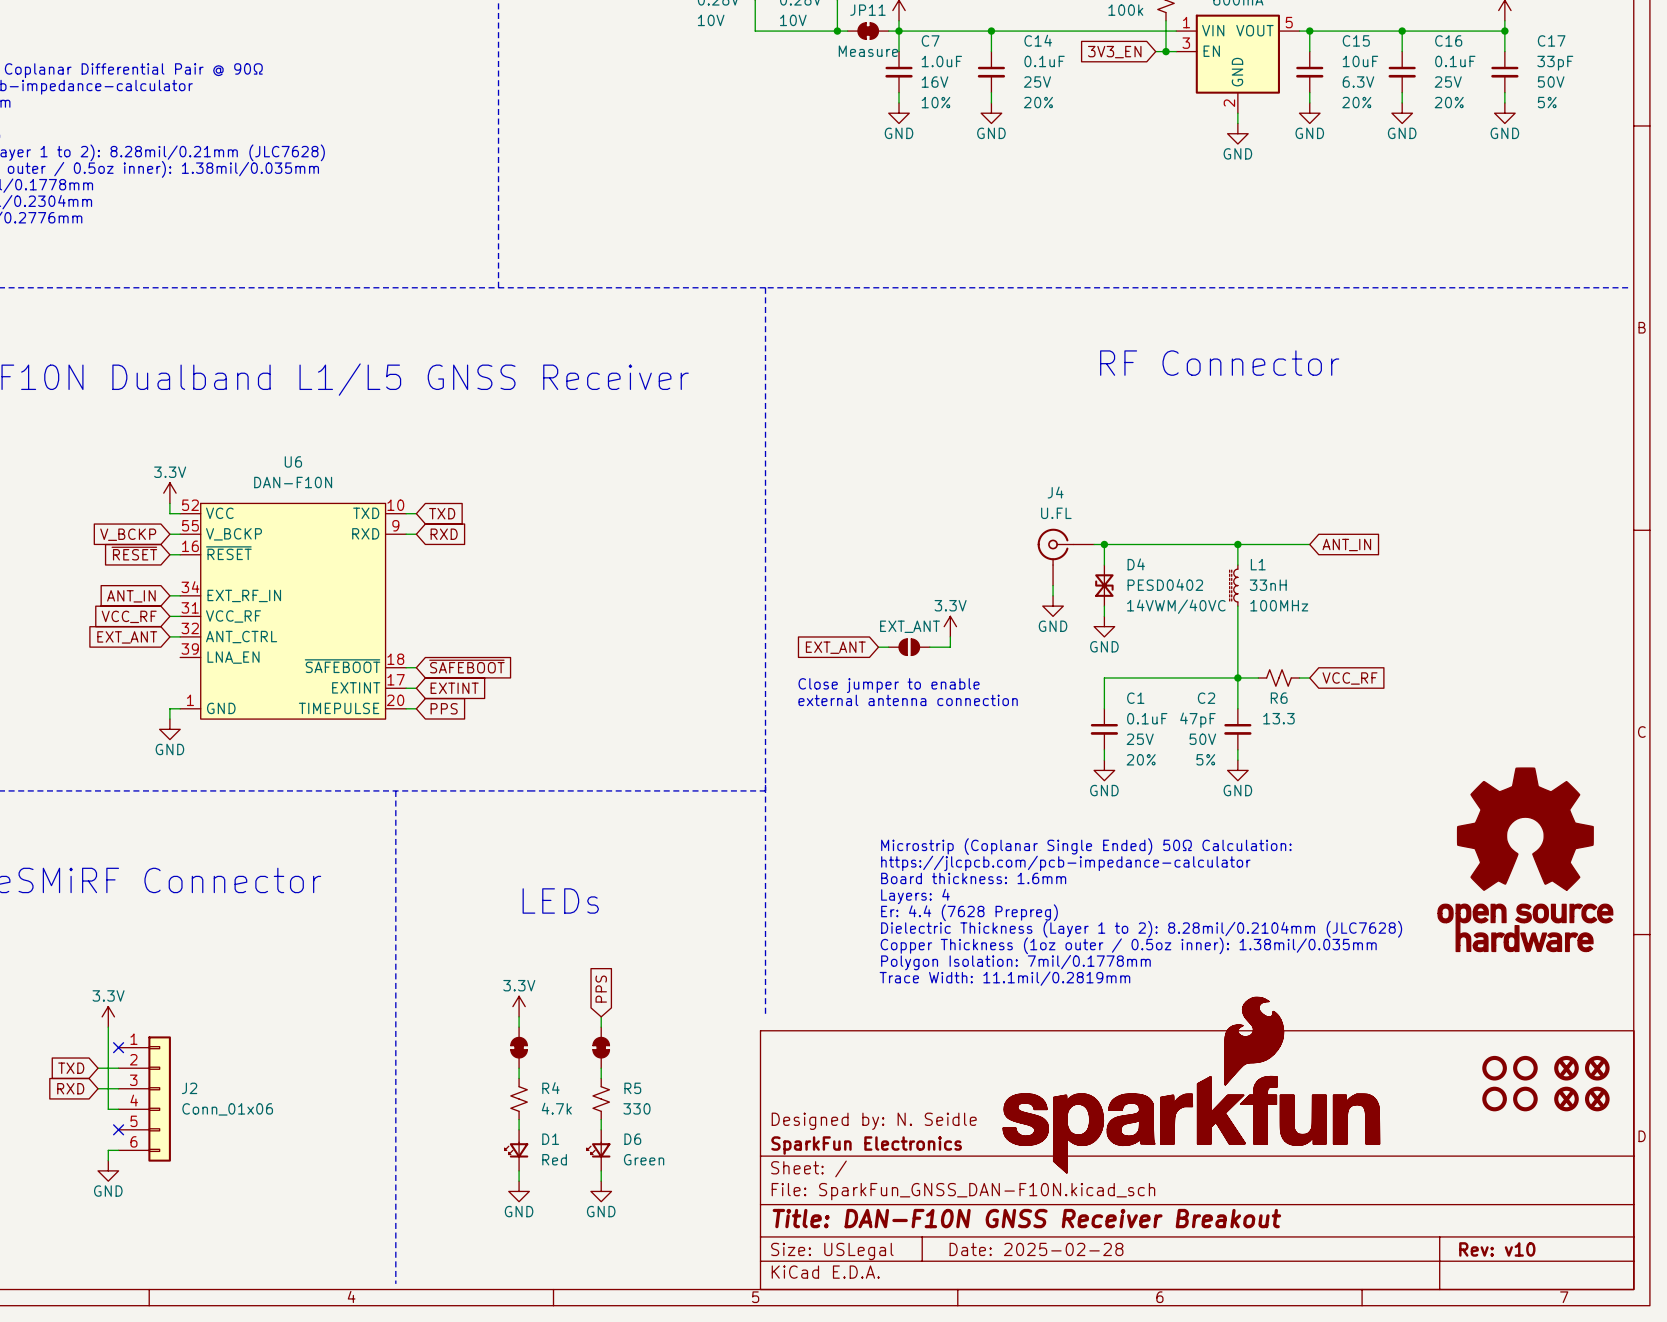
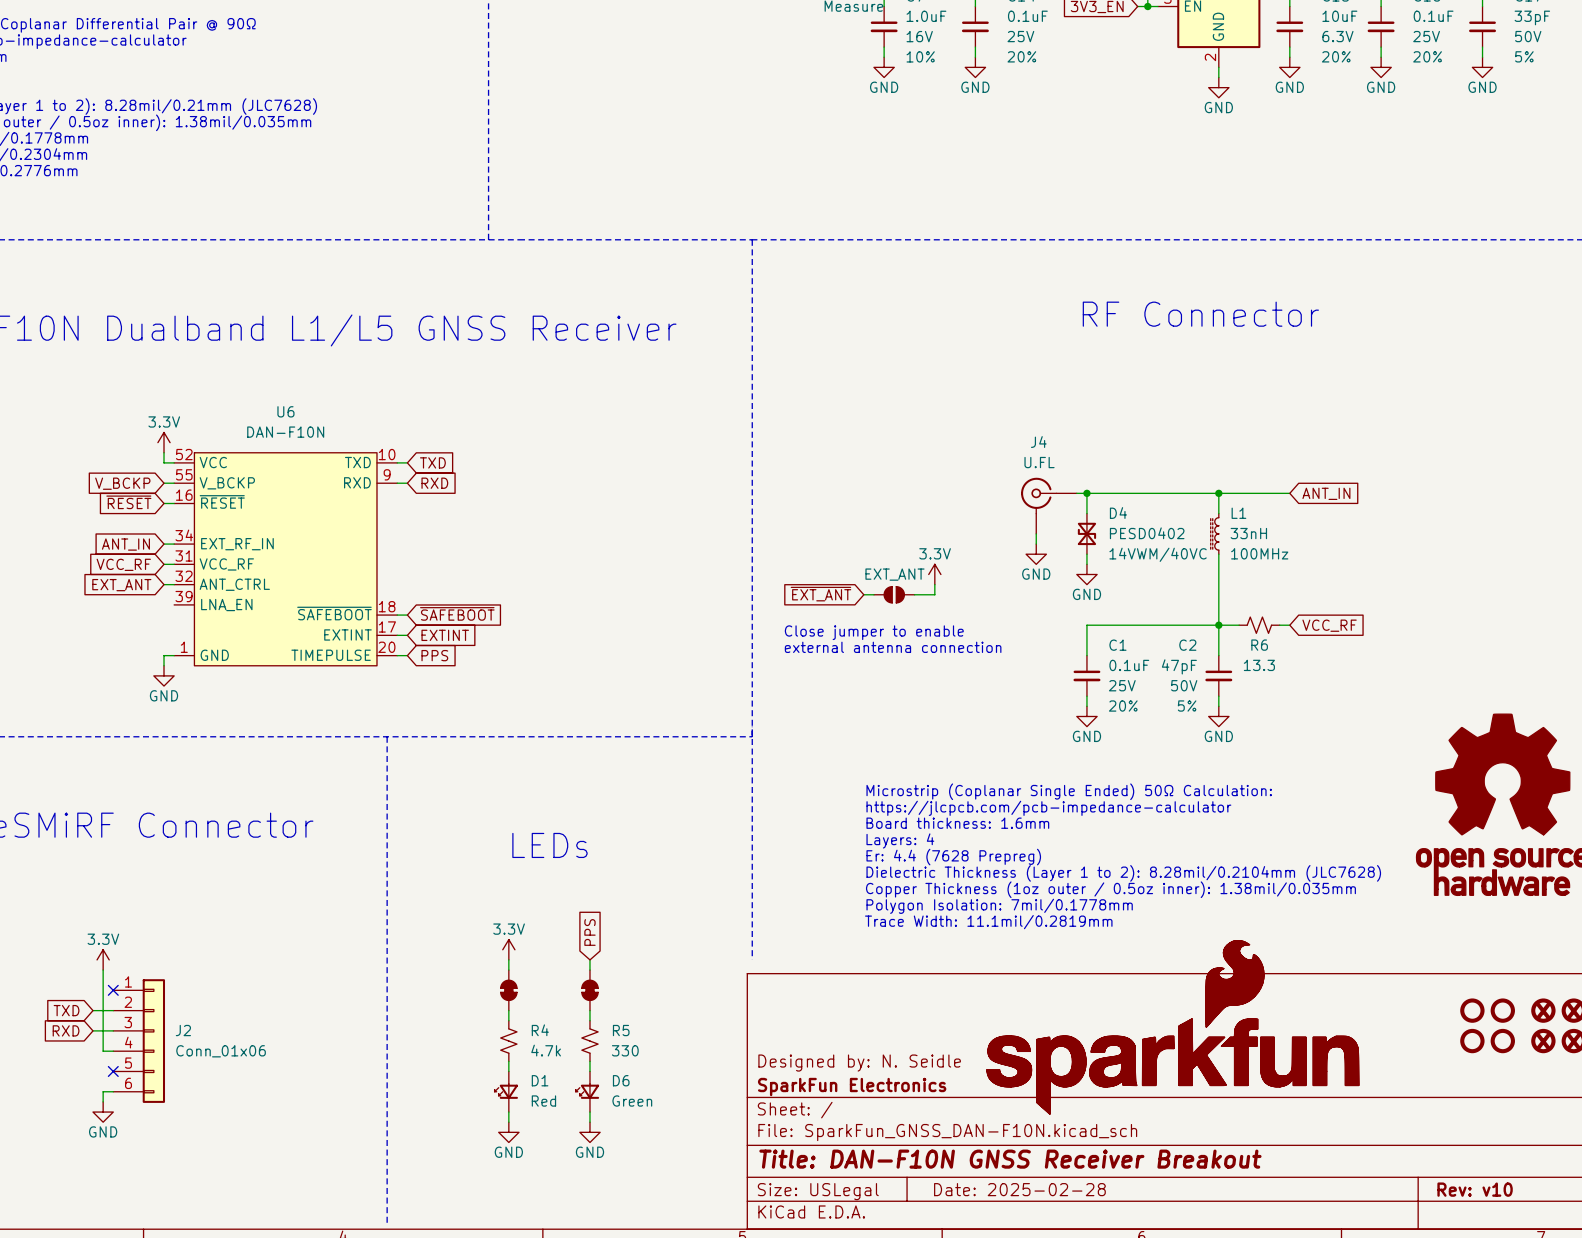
global label: EXT_ANT (835, 647) -> ~{EXT_ANT} (820, 594)

